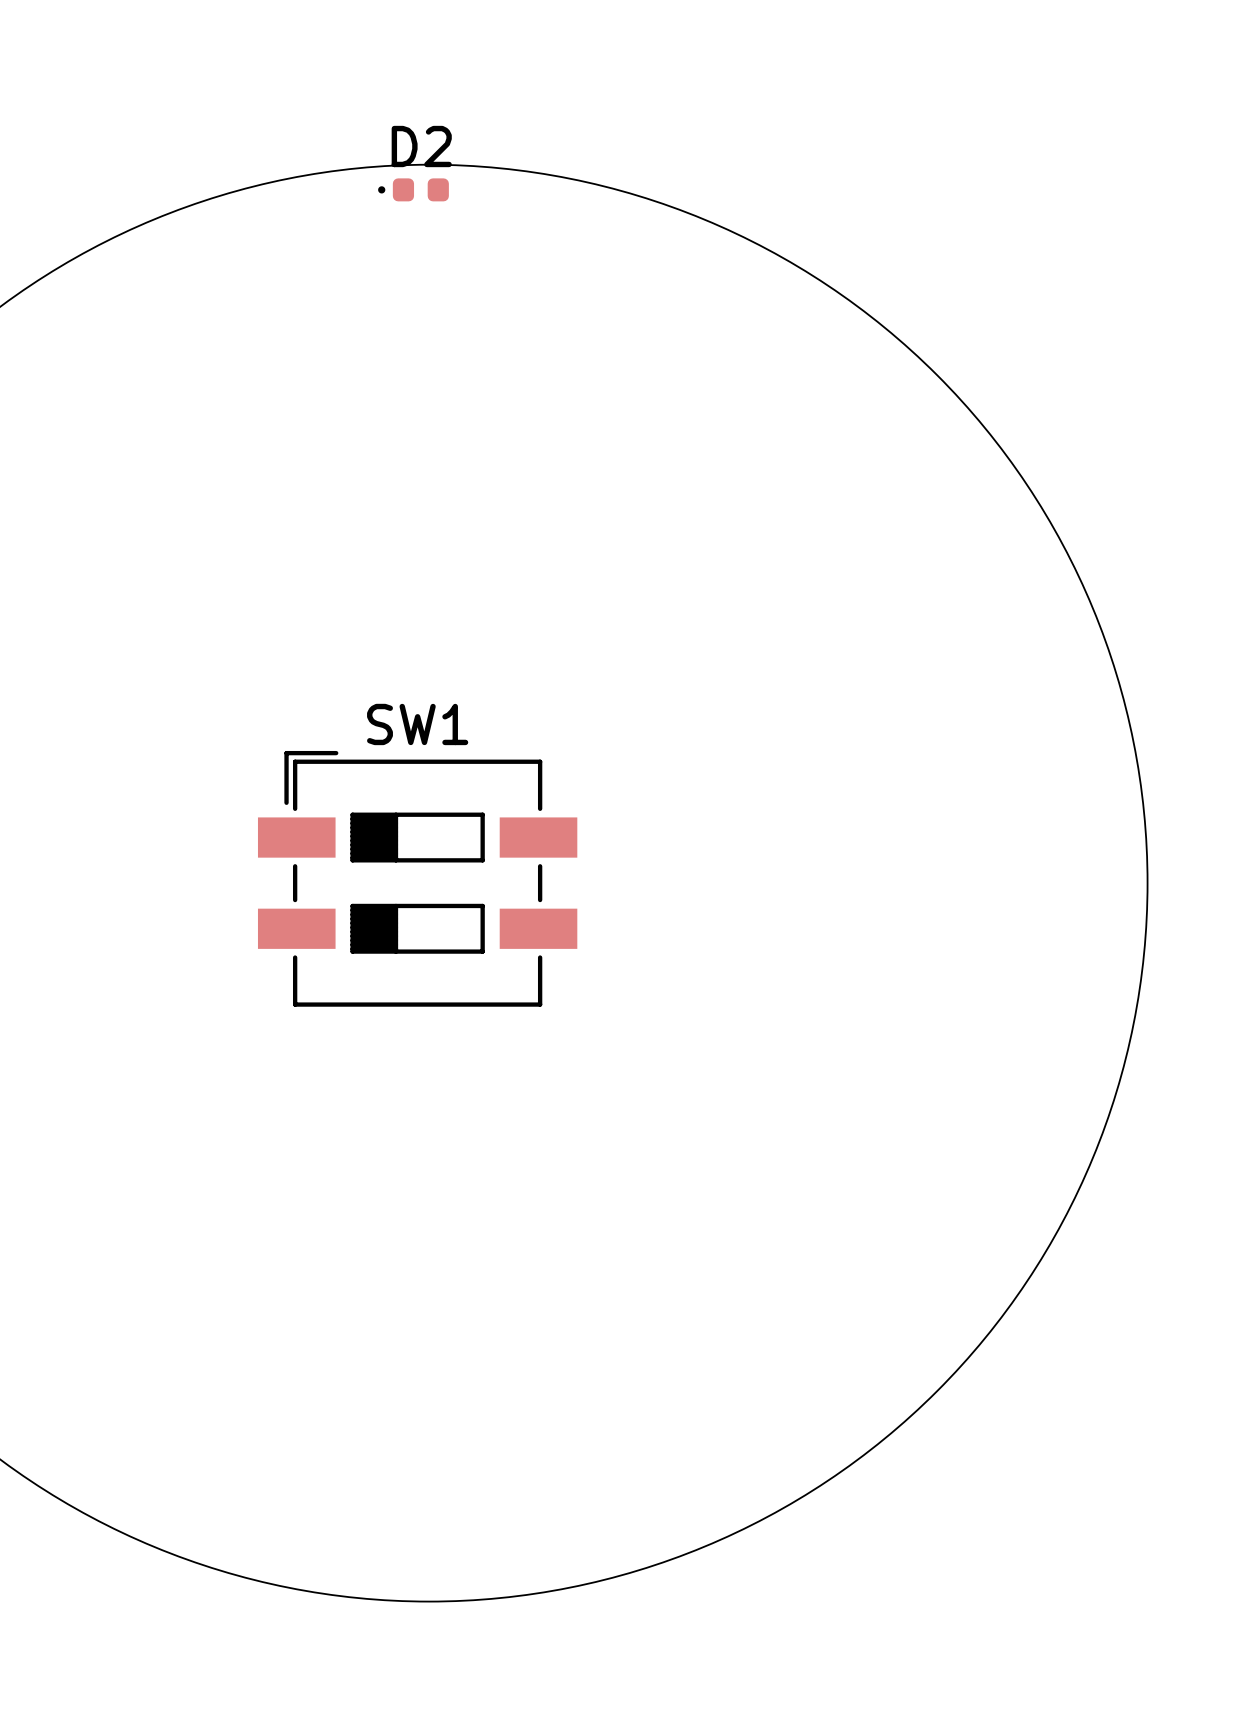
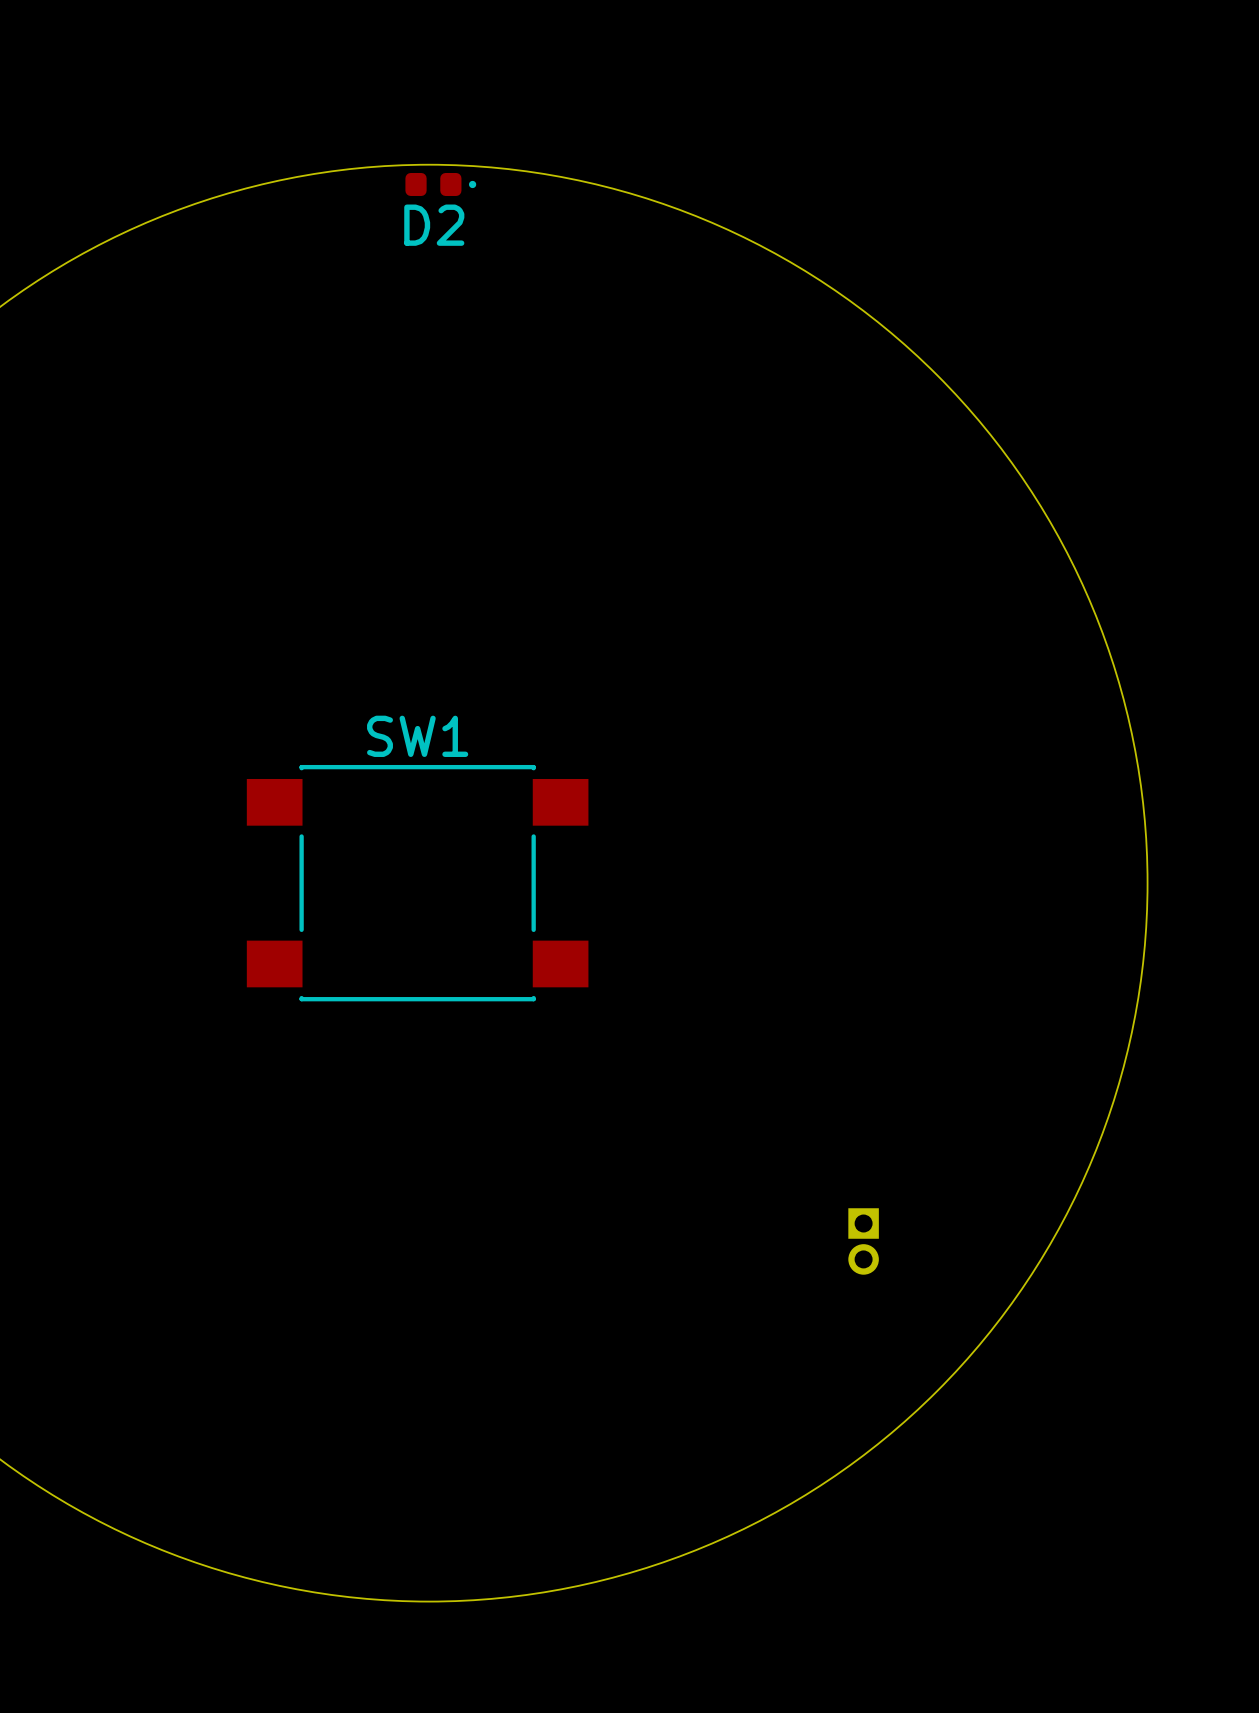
D2 rotation: 0° (413, 189) -> 180° (440, 184)
SW1 footprint: [257, 750, 578, 1007] -> [246, 764, 589, 1002]
part: none -> (863, 1241)

